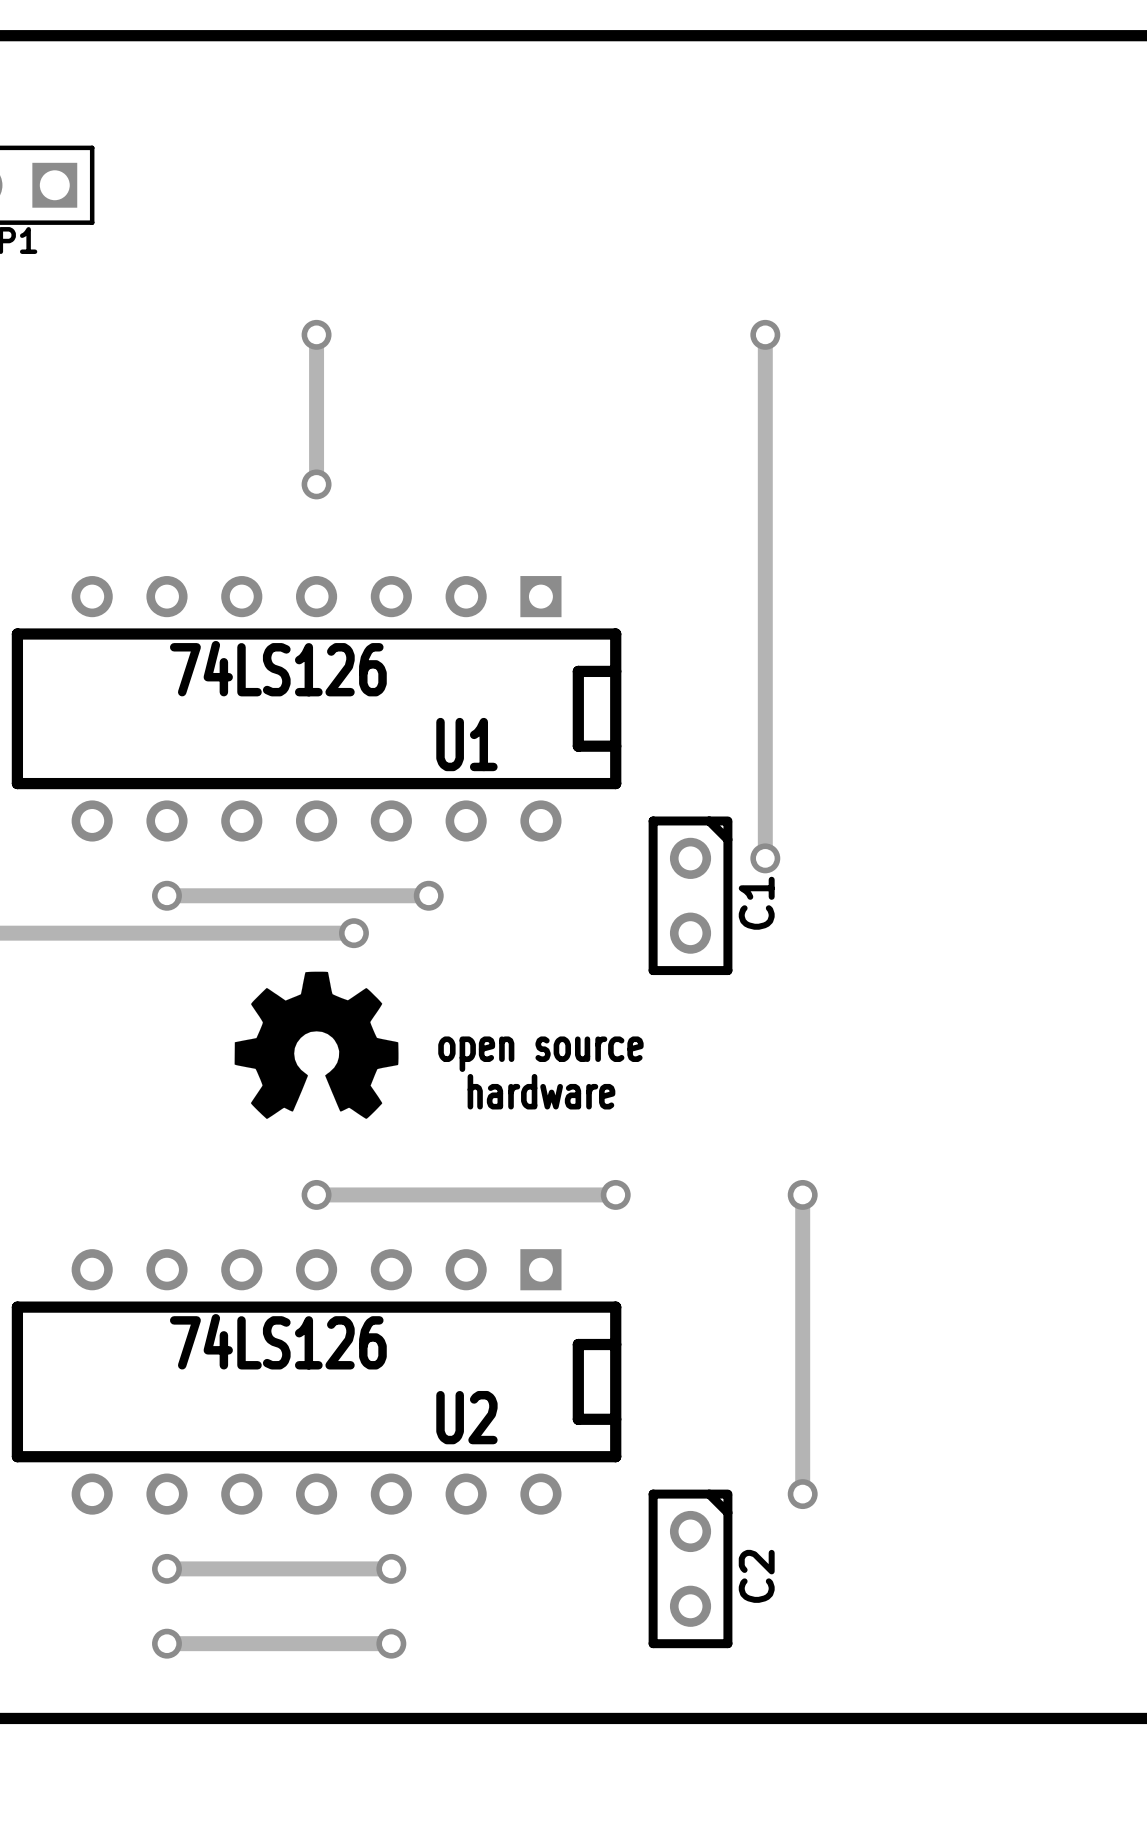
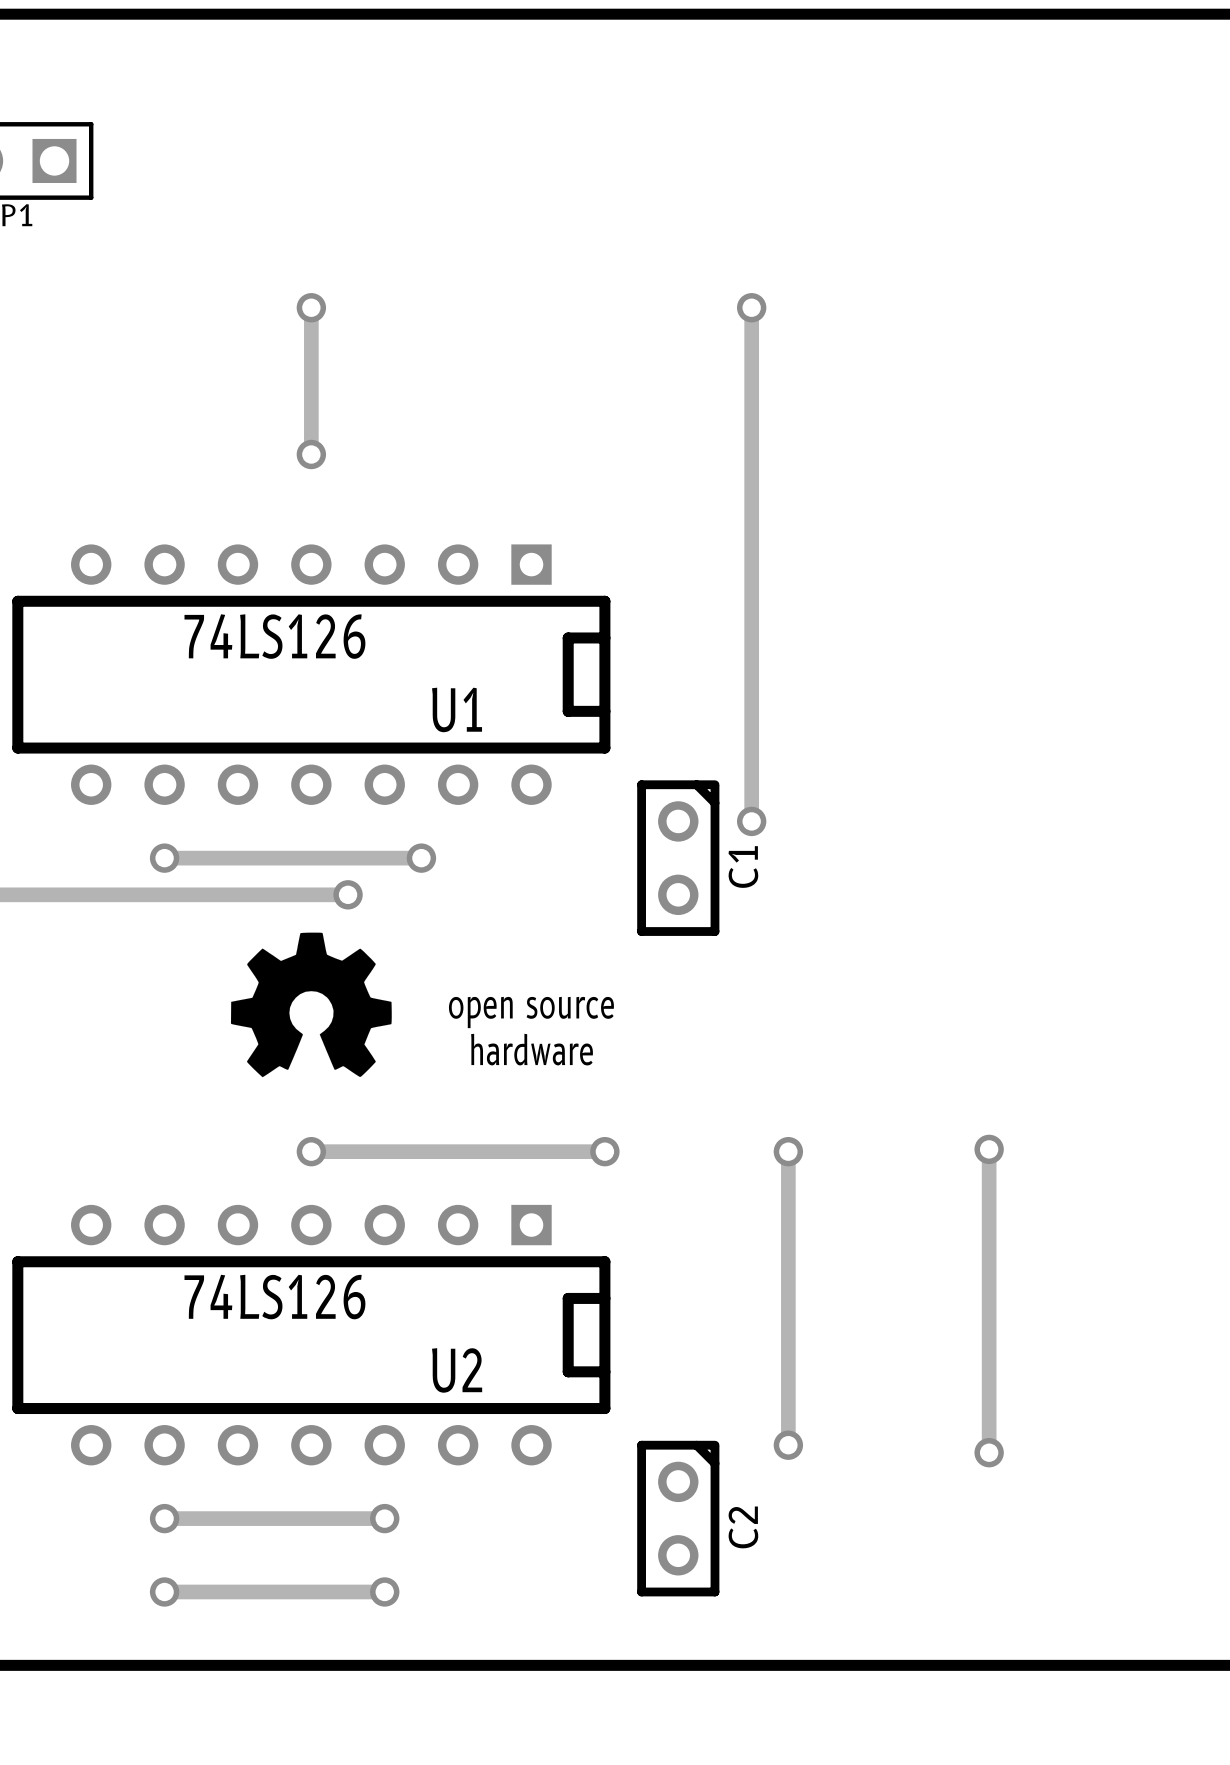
track: none -> (989, 1149) (989, 1452)
via: none -> (989, 1149)
via: none -> (989, 1452)

